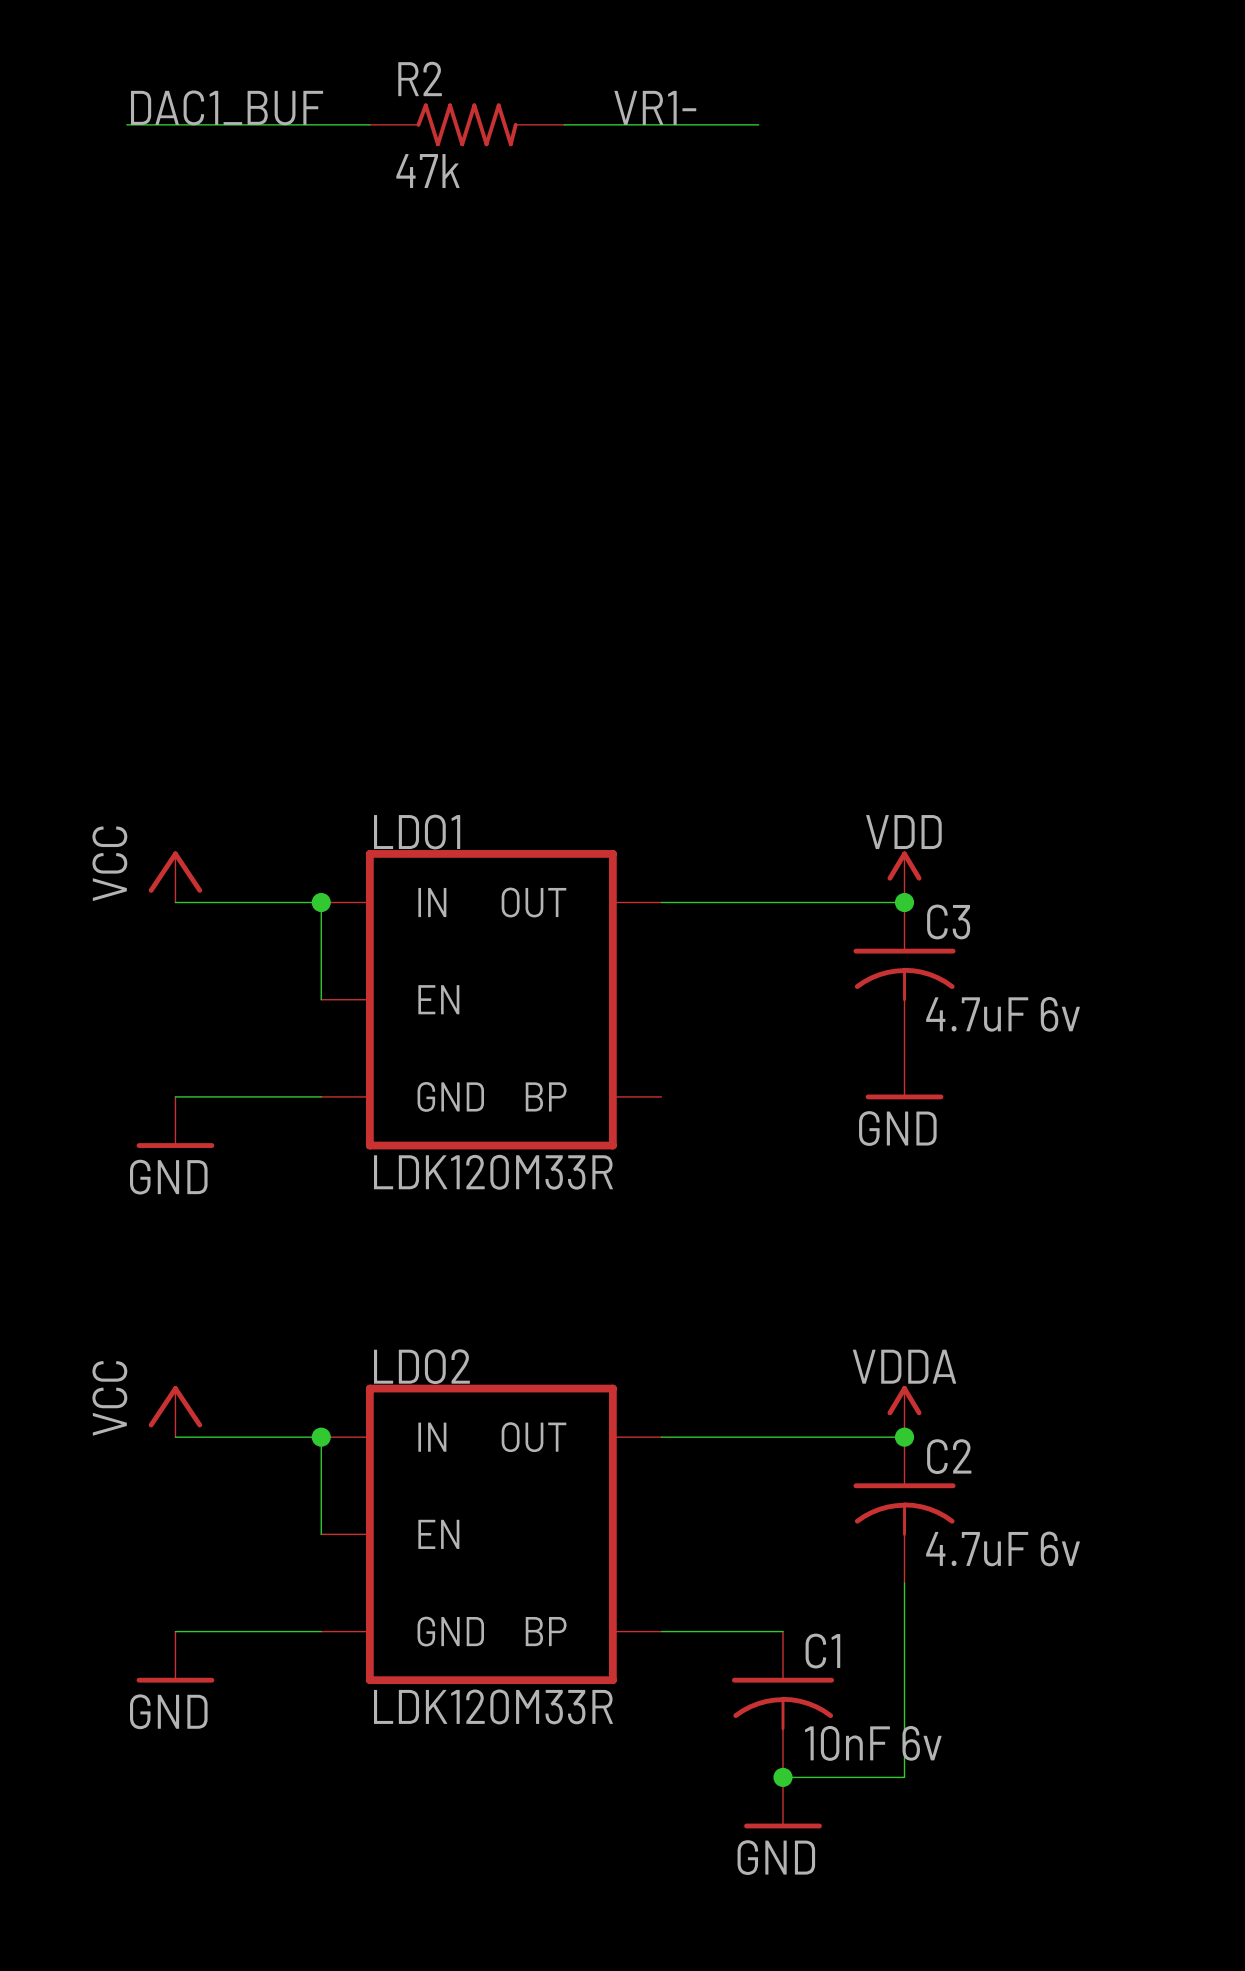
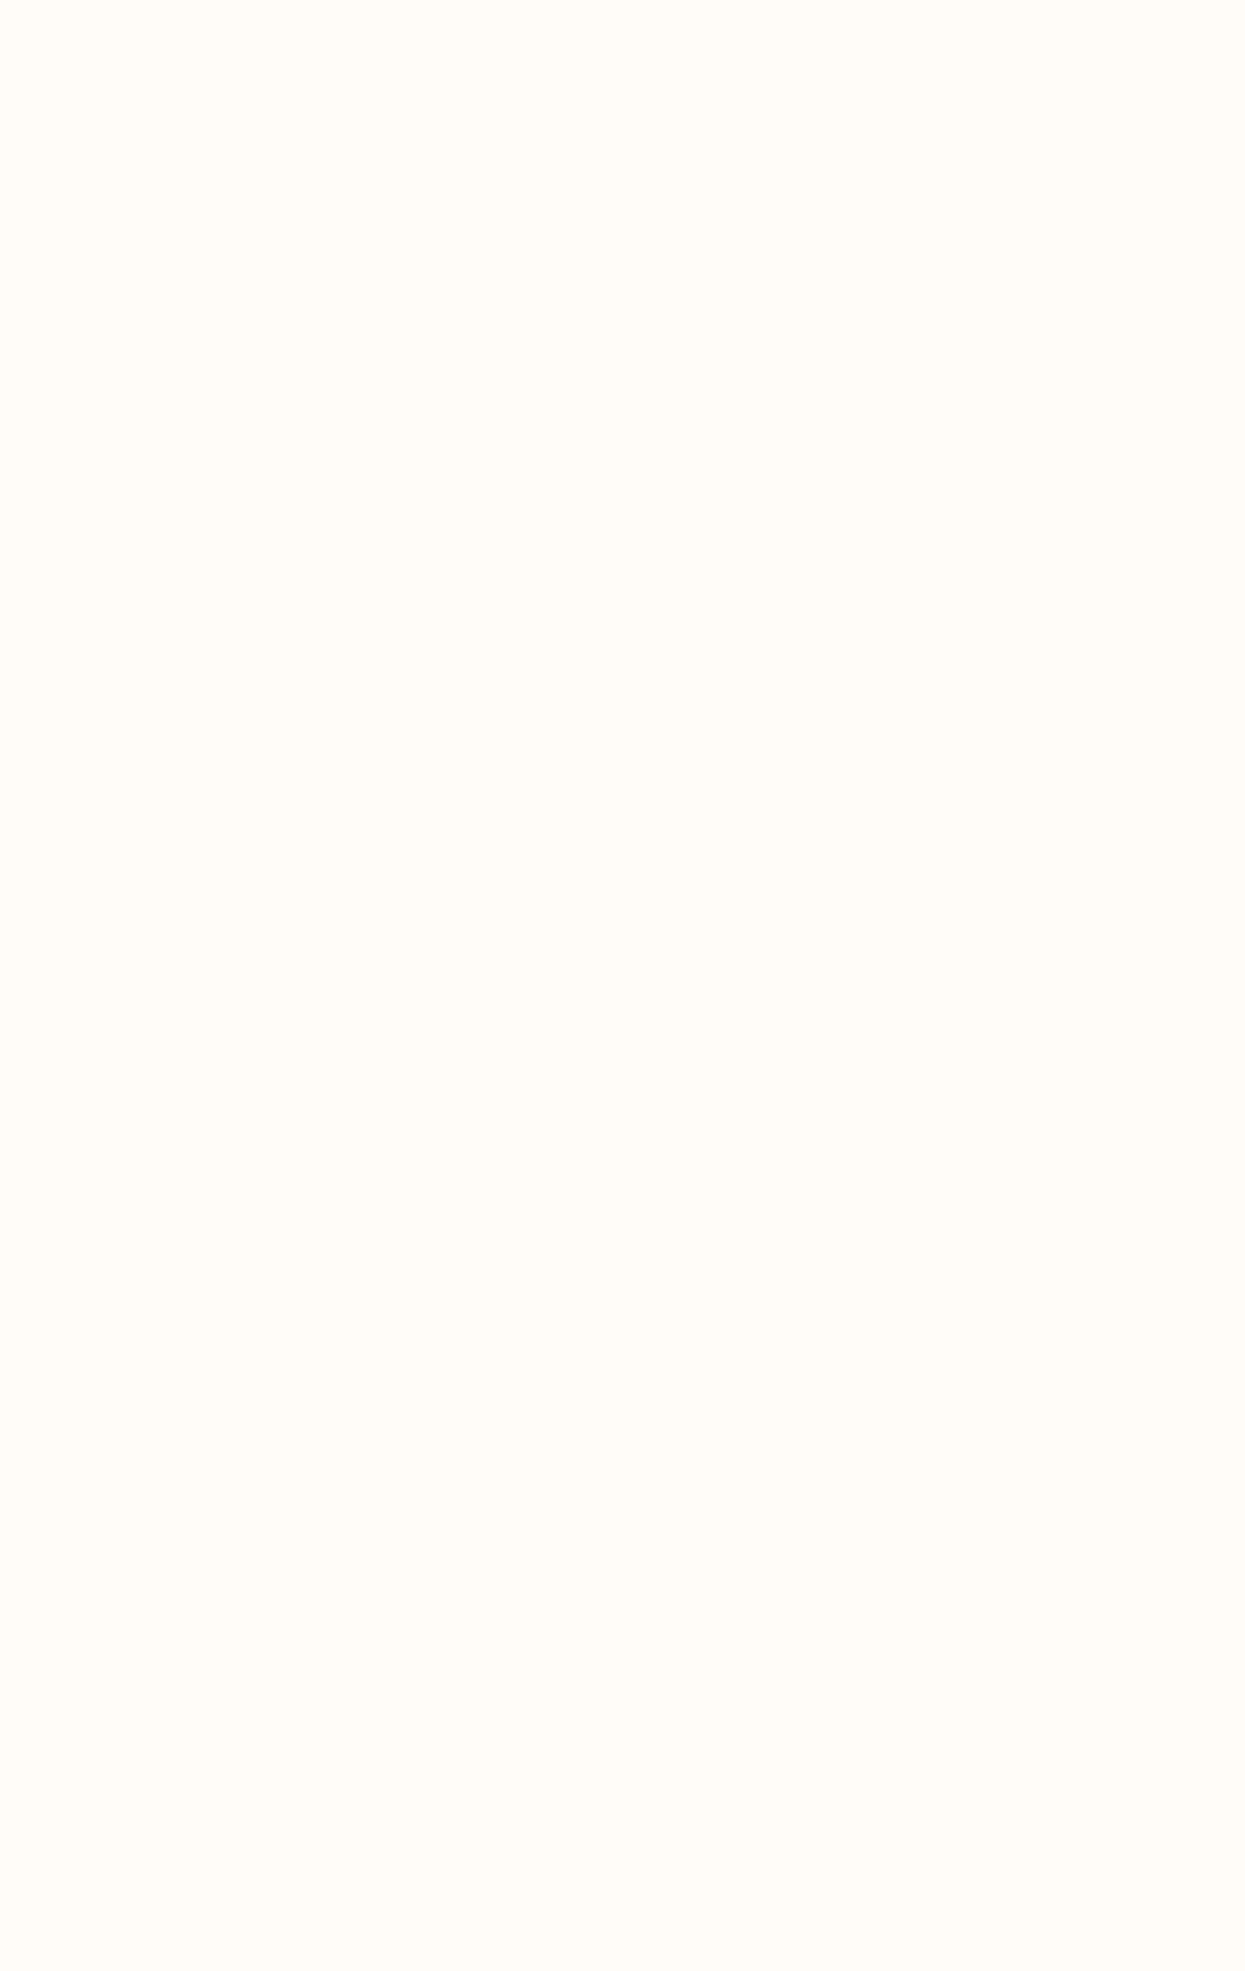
label: DAC1_BUF (227, 107) -> none
label: VR1- (655, 107) -> none
wire: (126, 124) (369, 124) -> none
R2: 47k (467, 124) -> none
wire: (564, 124) (758, 124) -> none
power symbol: VCC (175, 877) -> none
power symbol: VDD (904, 877) -> none
wire: (175, 902) (321, 902) (321, 999) -> none
junction: (321, 902) -> none
wire: (661, 902) (904, 902) -> none
junction: (904, 902) -> none
C3: 4.7uF 6v (904, 975) -> none
LDO1: LDK120M33R (491, 999) -> none
power symbol: GND (904, 1073) -> none
wire: (175, 1096) (321, 1096) -> none
power symbol: GND (175, 1122) -> none
power symbol: VCC (175, 1411) -> none
power symbol: VDDA (904, 1411) -> none
wire: (175, 1437) (321, 1437) (321, 1534) -> none
junction: (321, 1437) -> none
wire: (661, 1437) (904, 1437) -> none
junction: (904, 1437) -> none
C2: 4.7uF 6v (904, 1510) -> none
LDO2: LDK120M33R (491, 1534) -> none
wire: (904, 1582) (904, 1777) (783, 1777) -> none
wire: (175, 1631) (321, 1631) -> none
wire: (661, 1631) (783, 1631) -> none
power symbol: GND (175, 1657) -> none
C1: 10nF 6v (783, 1704) -> none
junction: (783, 1777) -> none
power symbol: GND (783, 1802) -> none

